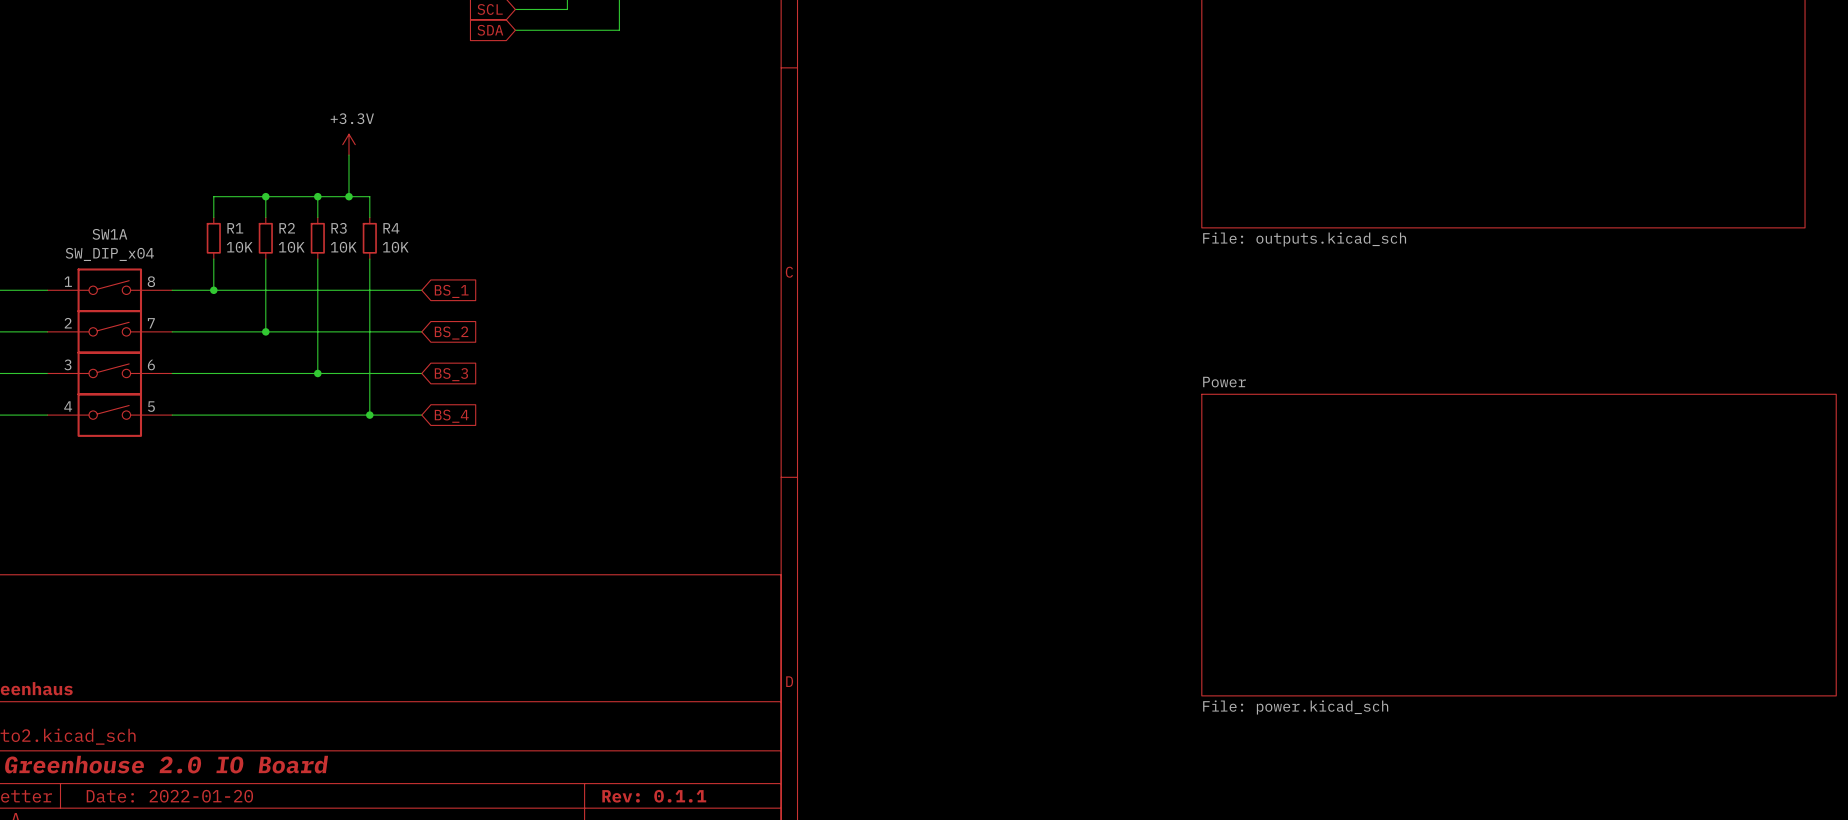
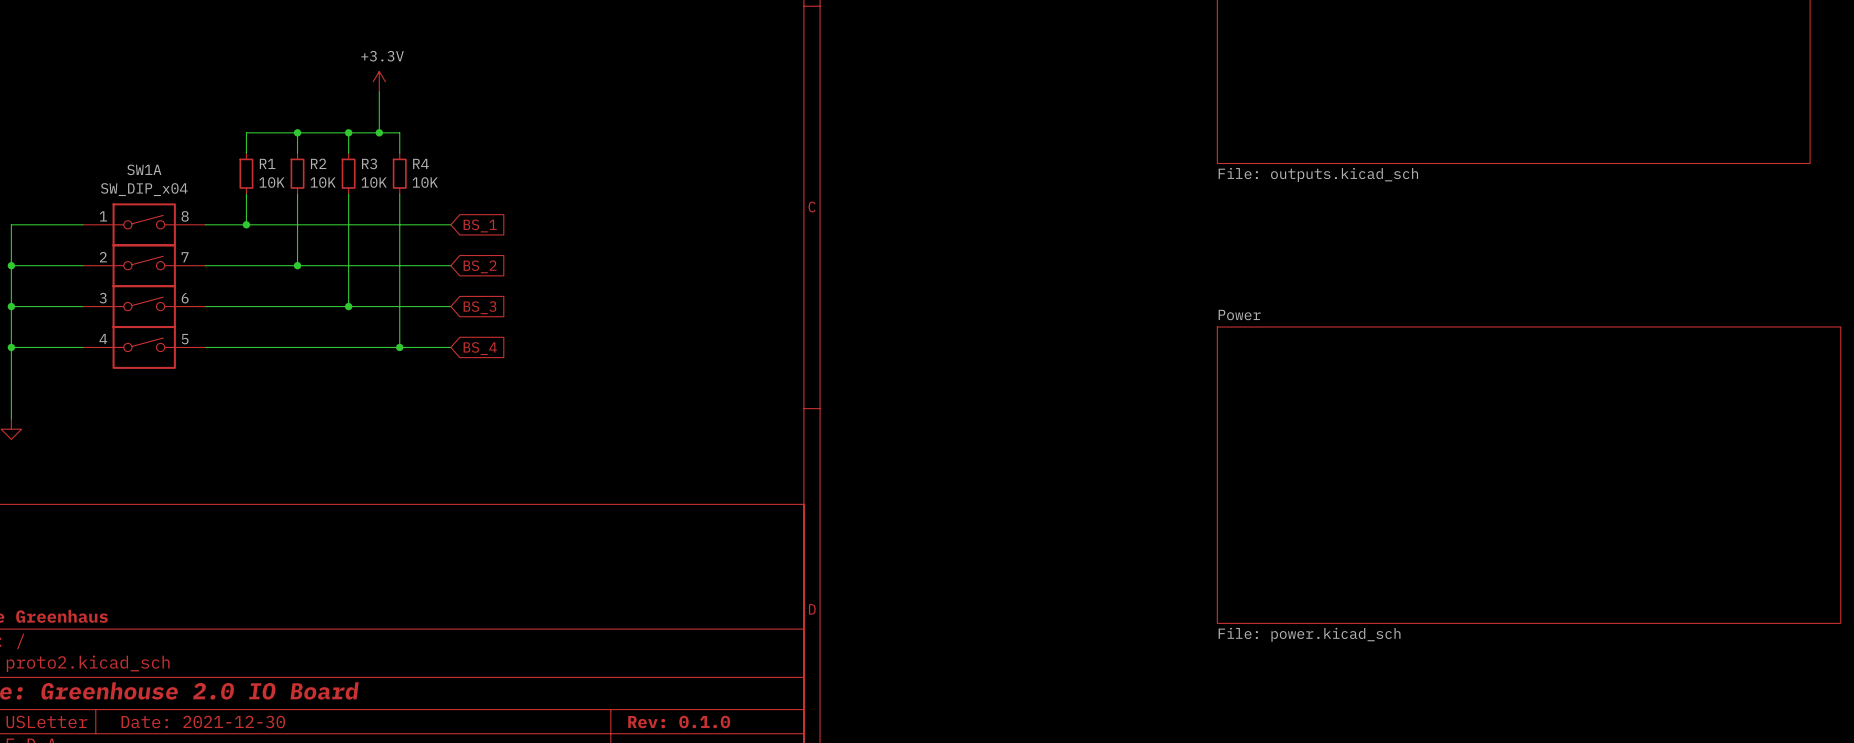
title block: Date: 2022-01-20 (169, 796) -> Date: 2021-12-30 (203, 722)
title block: Rev: 0.1.1 (654, 796) -> Rev: 0.1.0 (679, 722)

